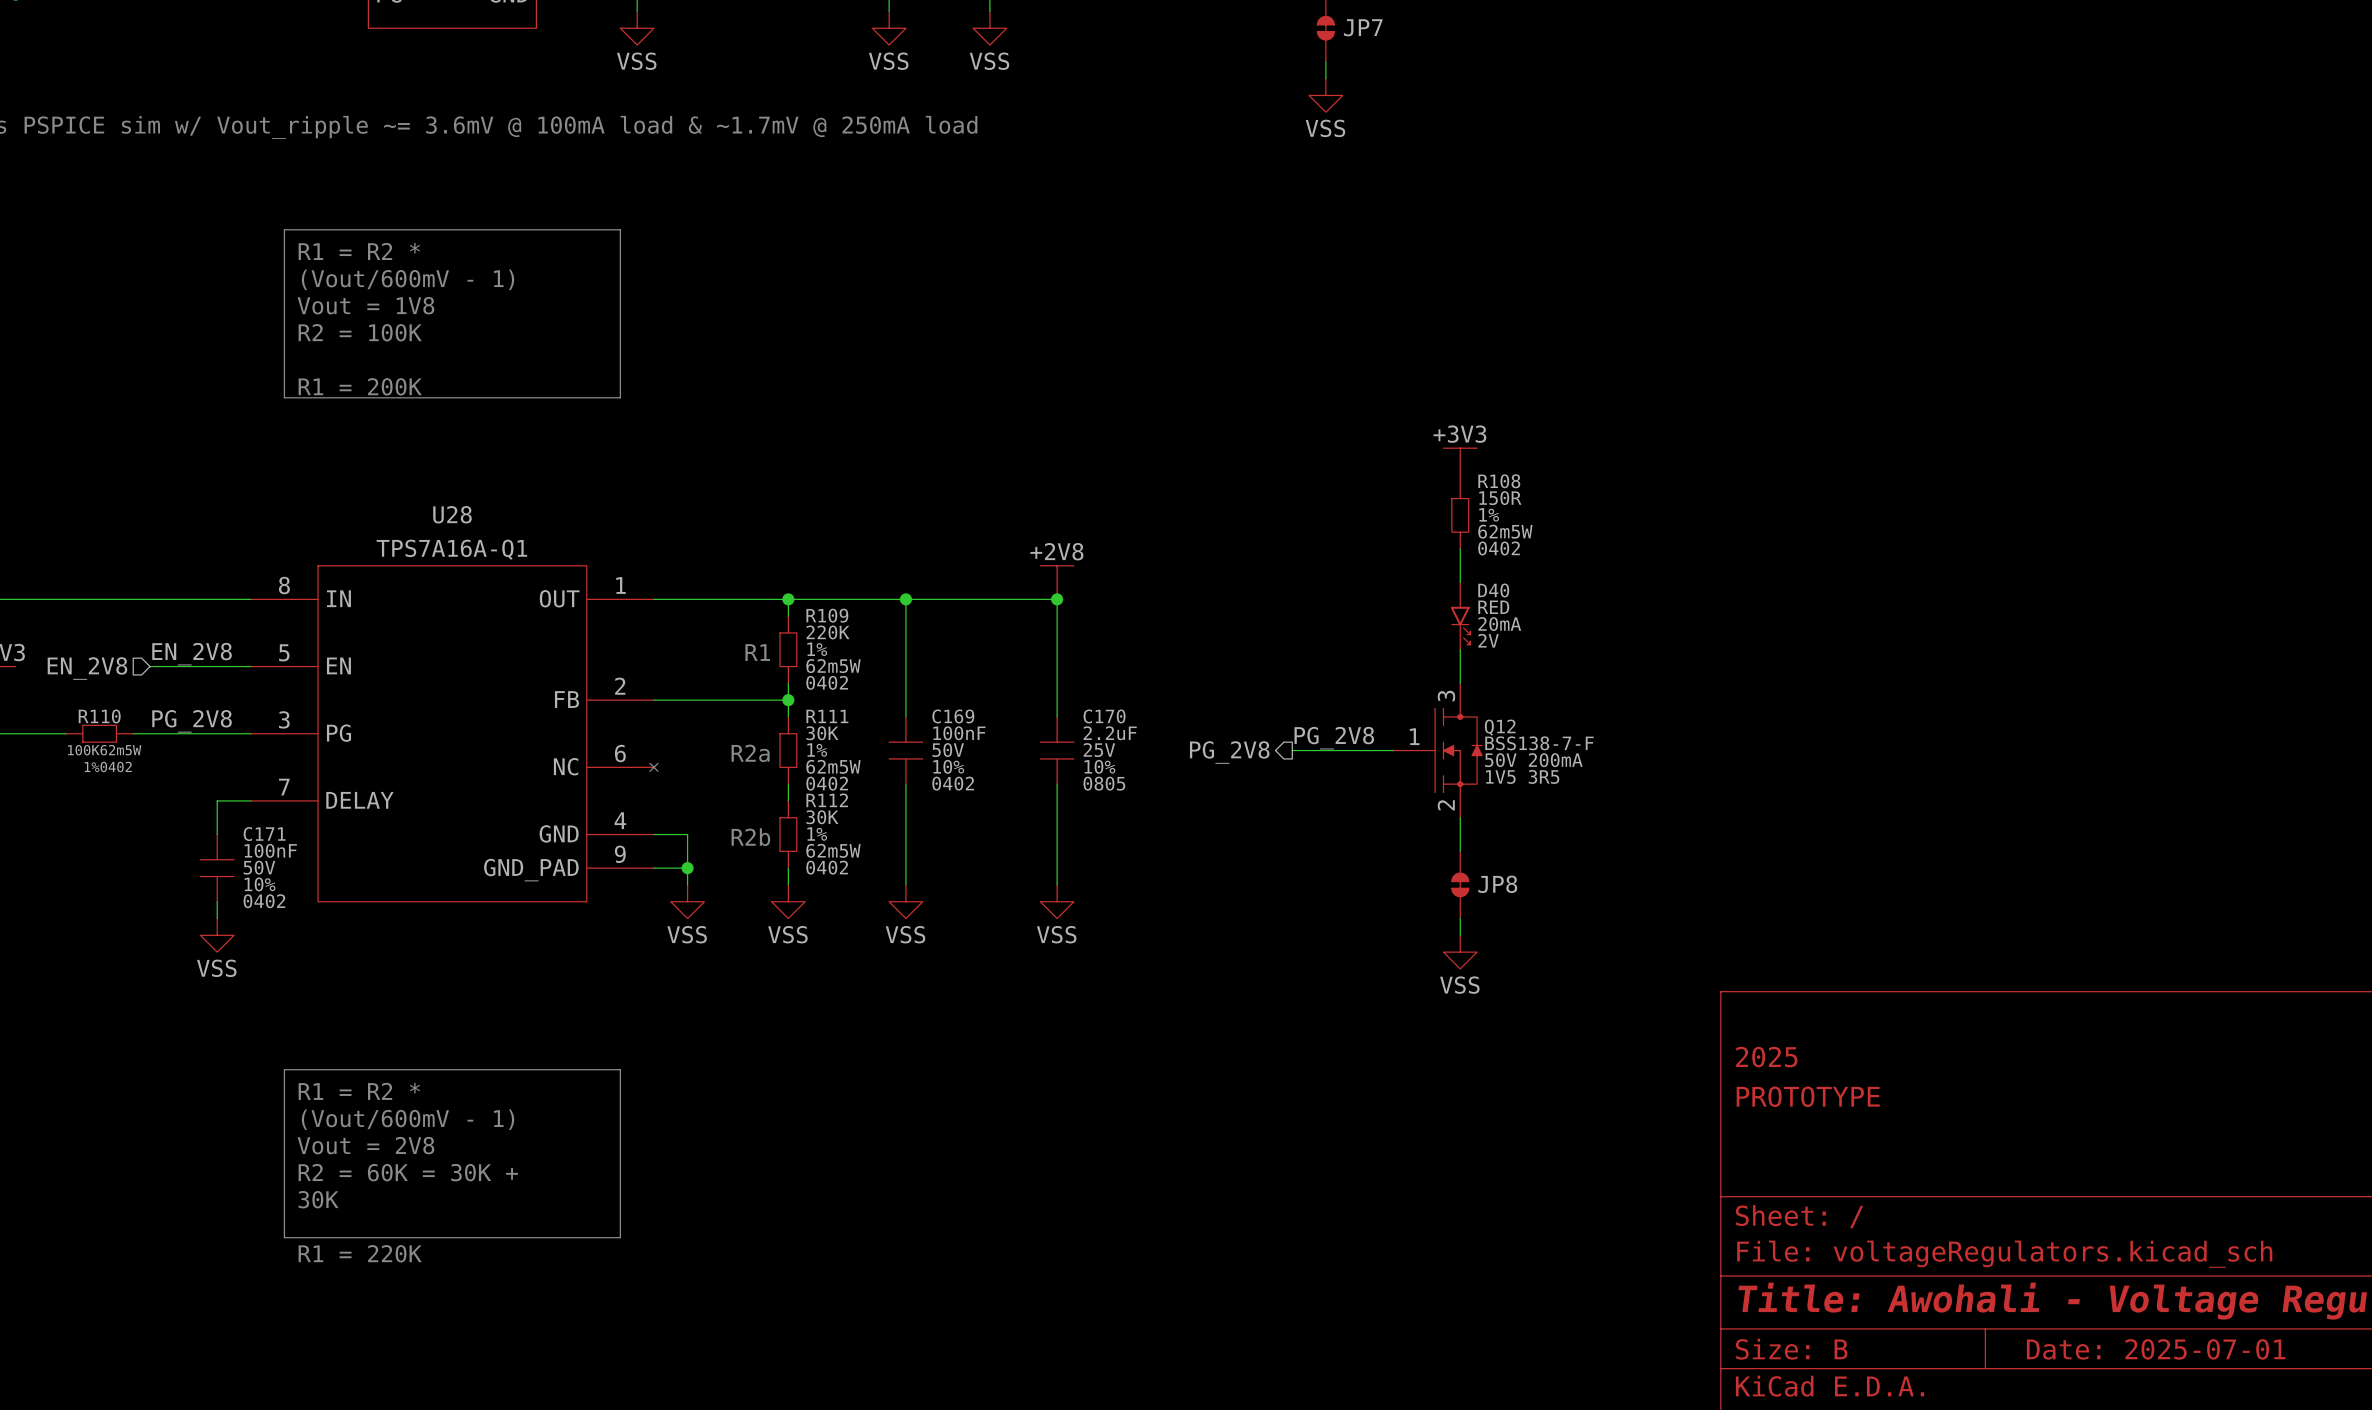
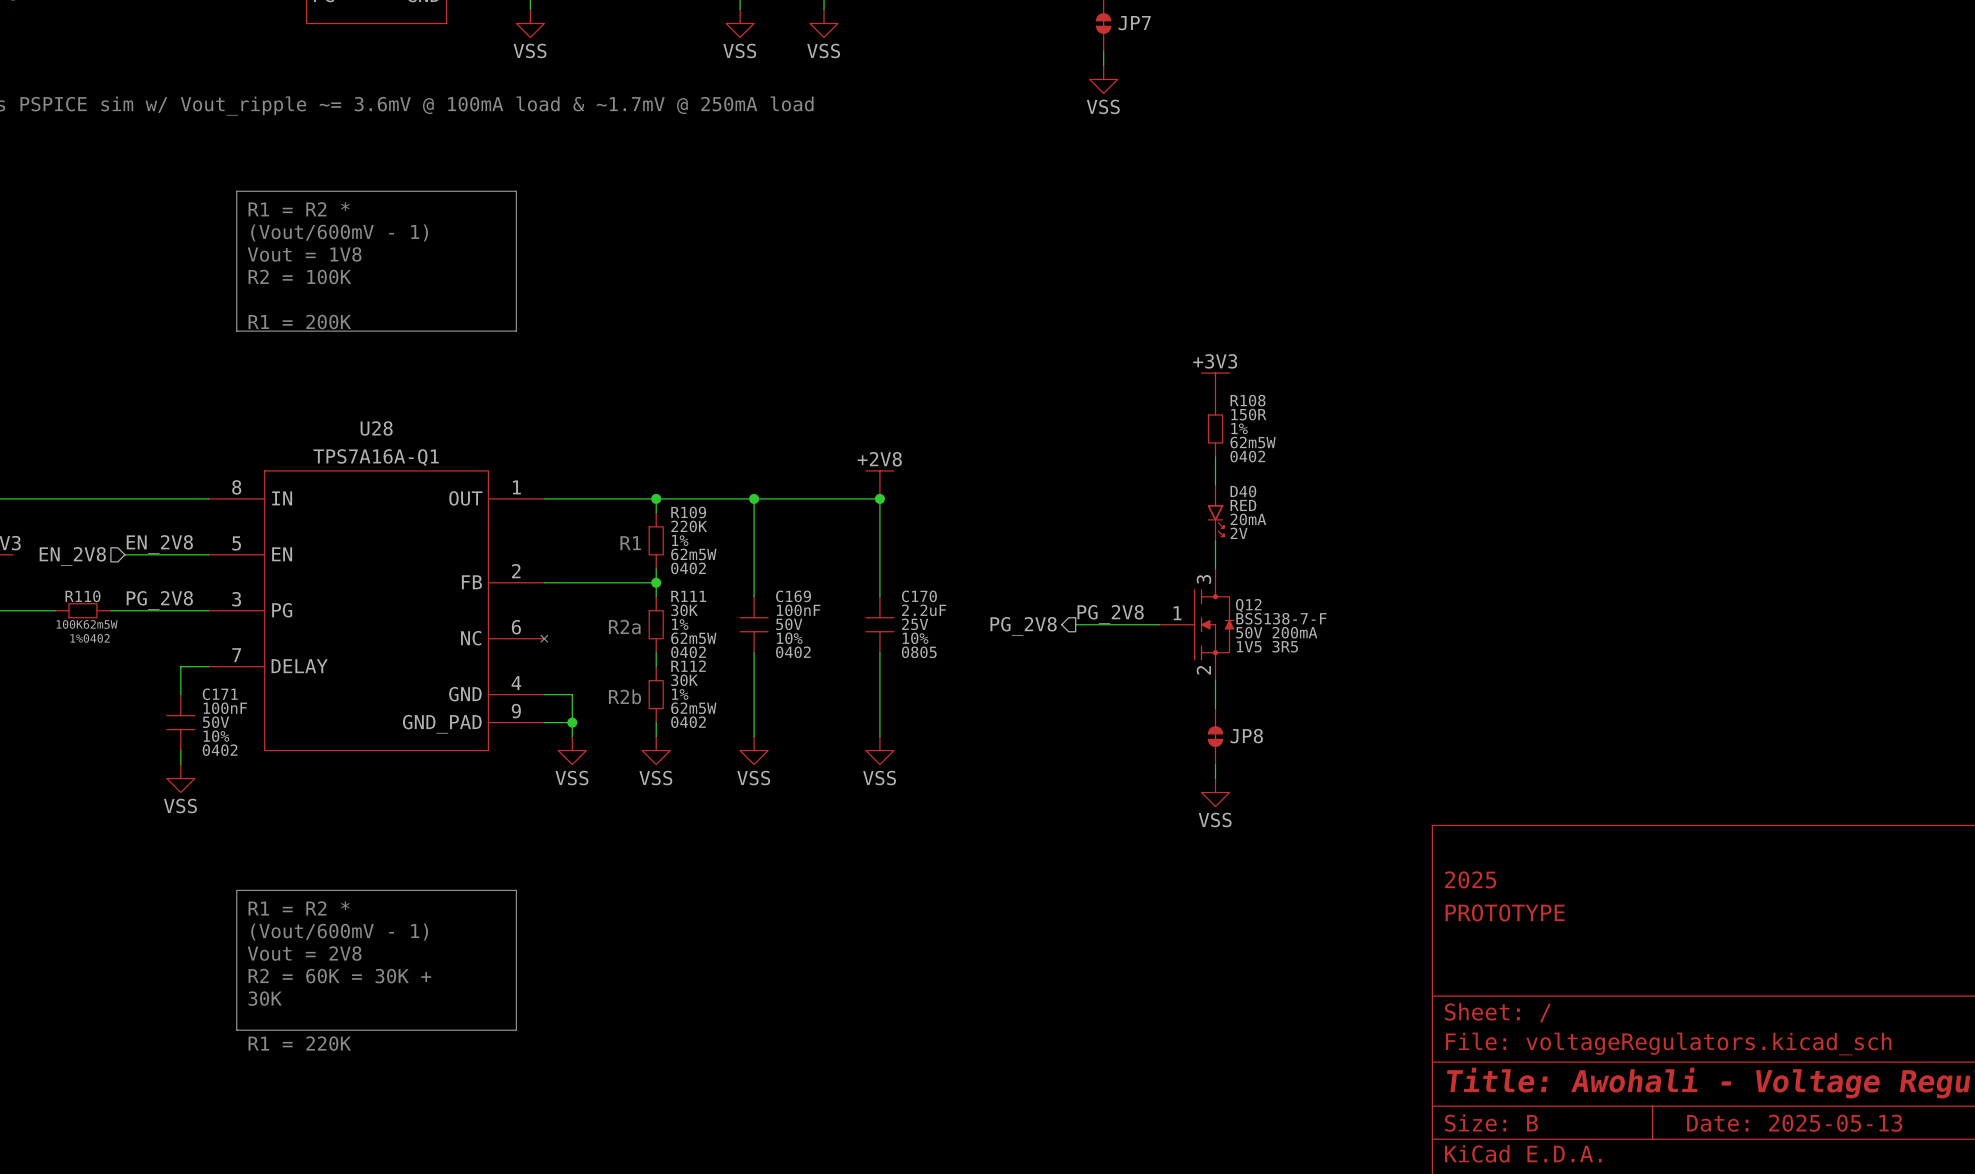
title block: Date: 2025-07-01 (2156, 1349) -> Date: 2025-05-13 (1794, 1123)

